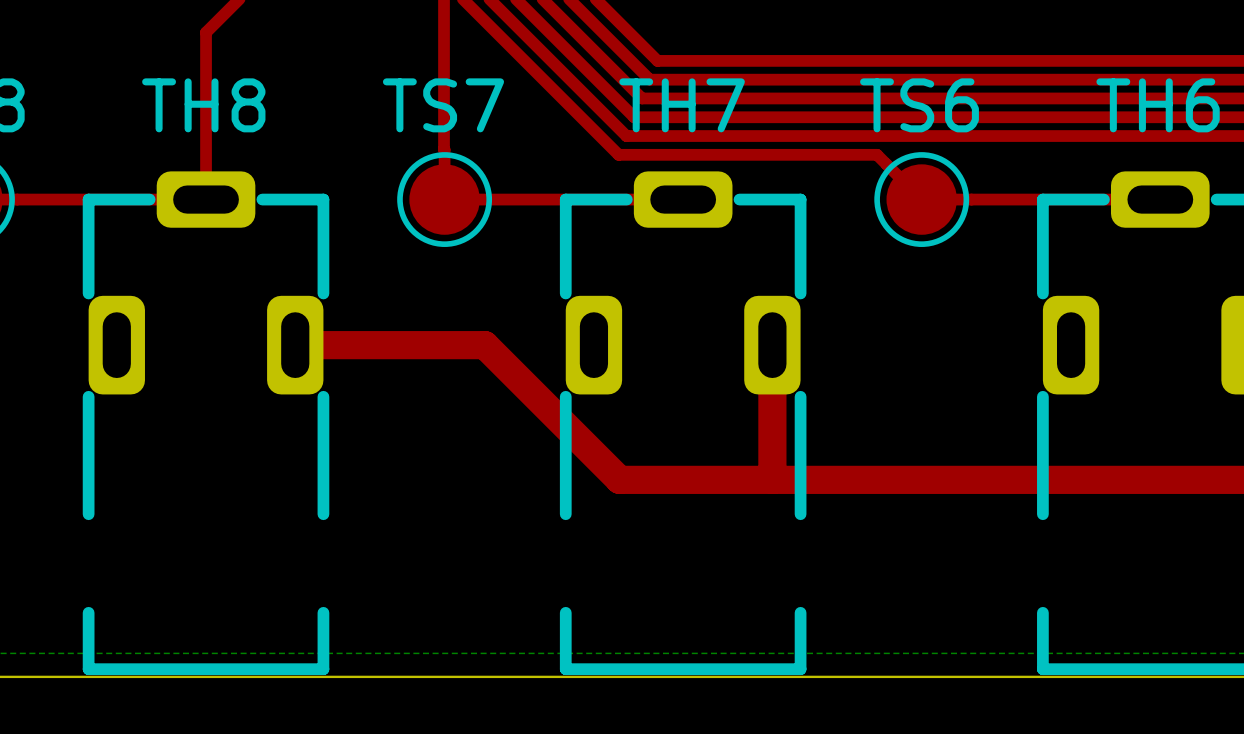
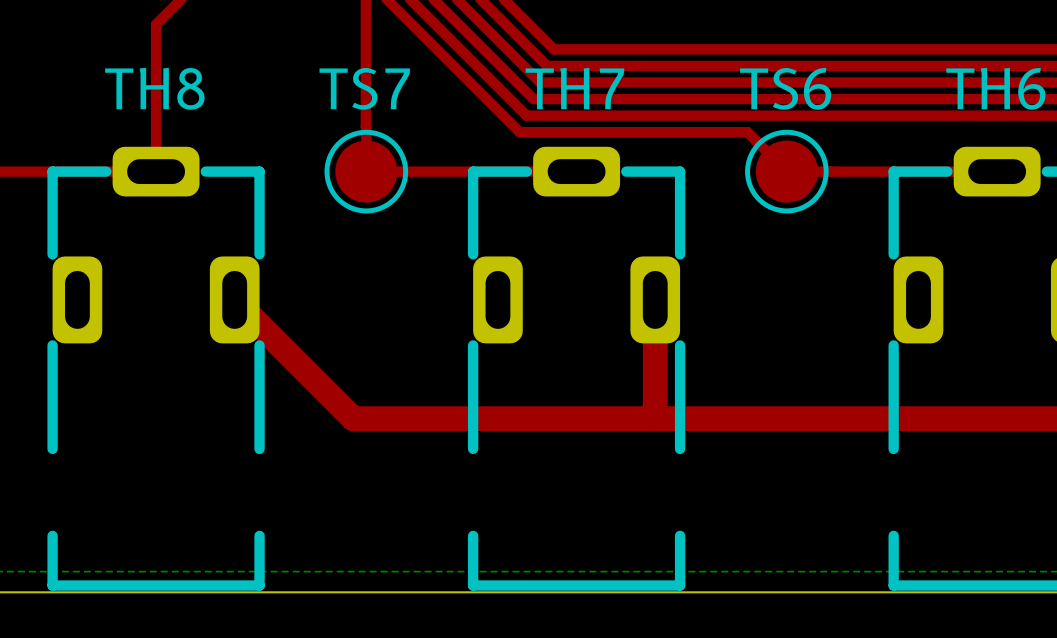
top track: (295, 345) (484, 345) (619, 479) -> (234, 300) (353, 418) (520, 418)

